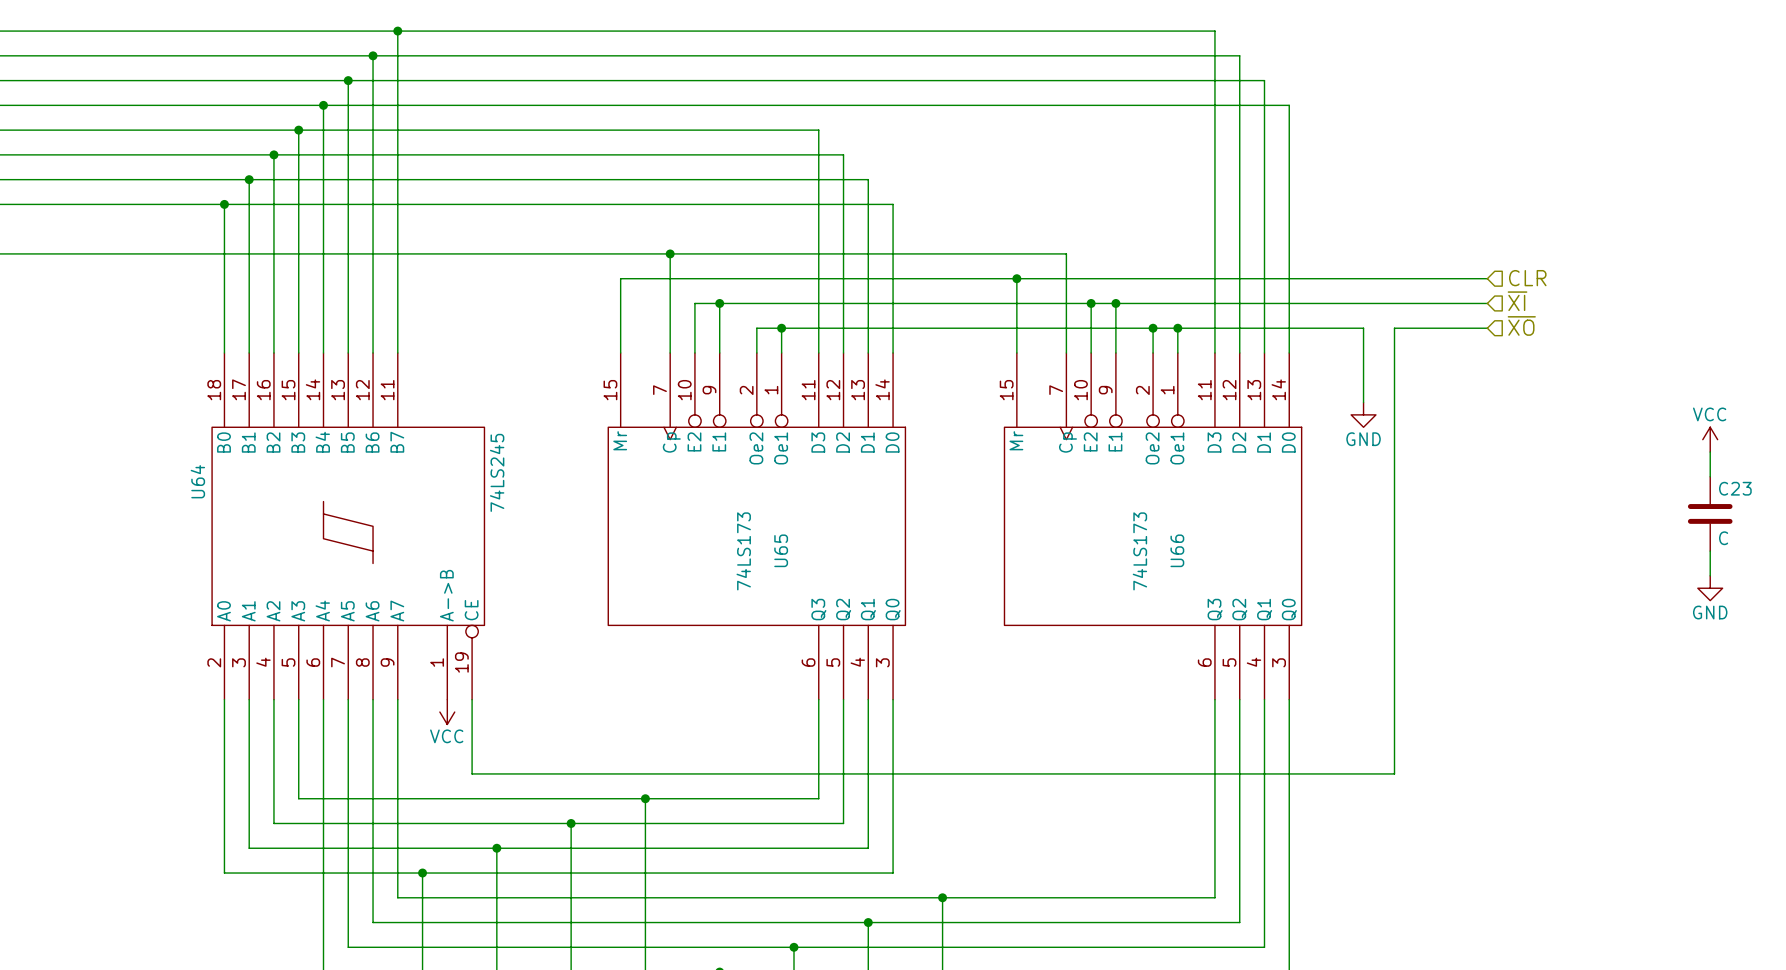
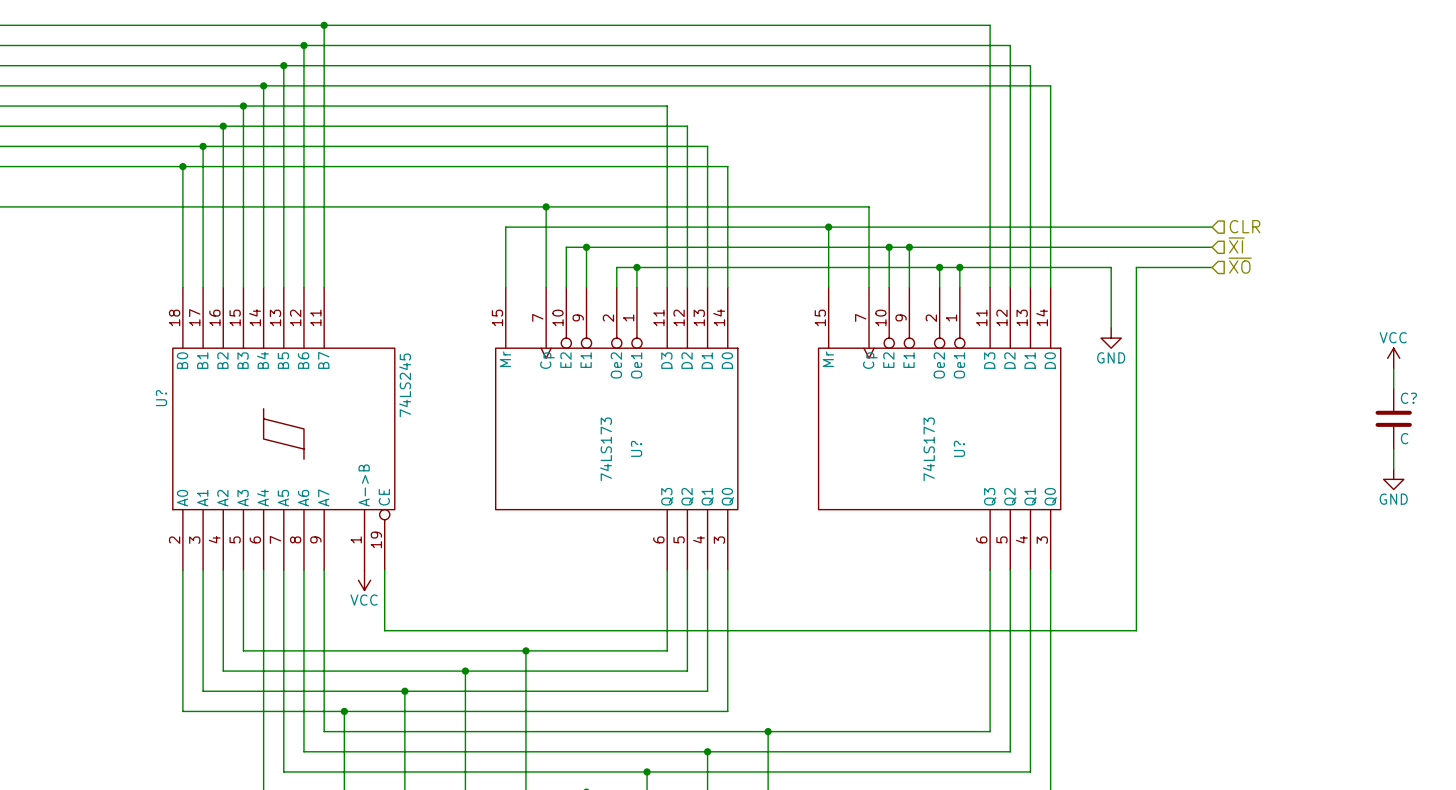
U64 name: U64 (197, 481) -> U? (161, 398)
C23 name: C23 (1735, 488) -> C? (1408, 398)
U65 name: U65 (781, 550) -> U? (636, 448)
U66 name: U66 (1177, 550) -> U? (959, 448)

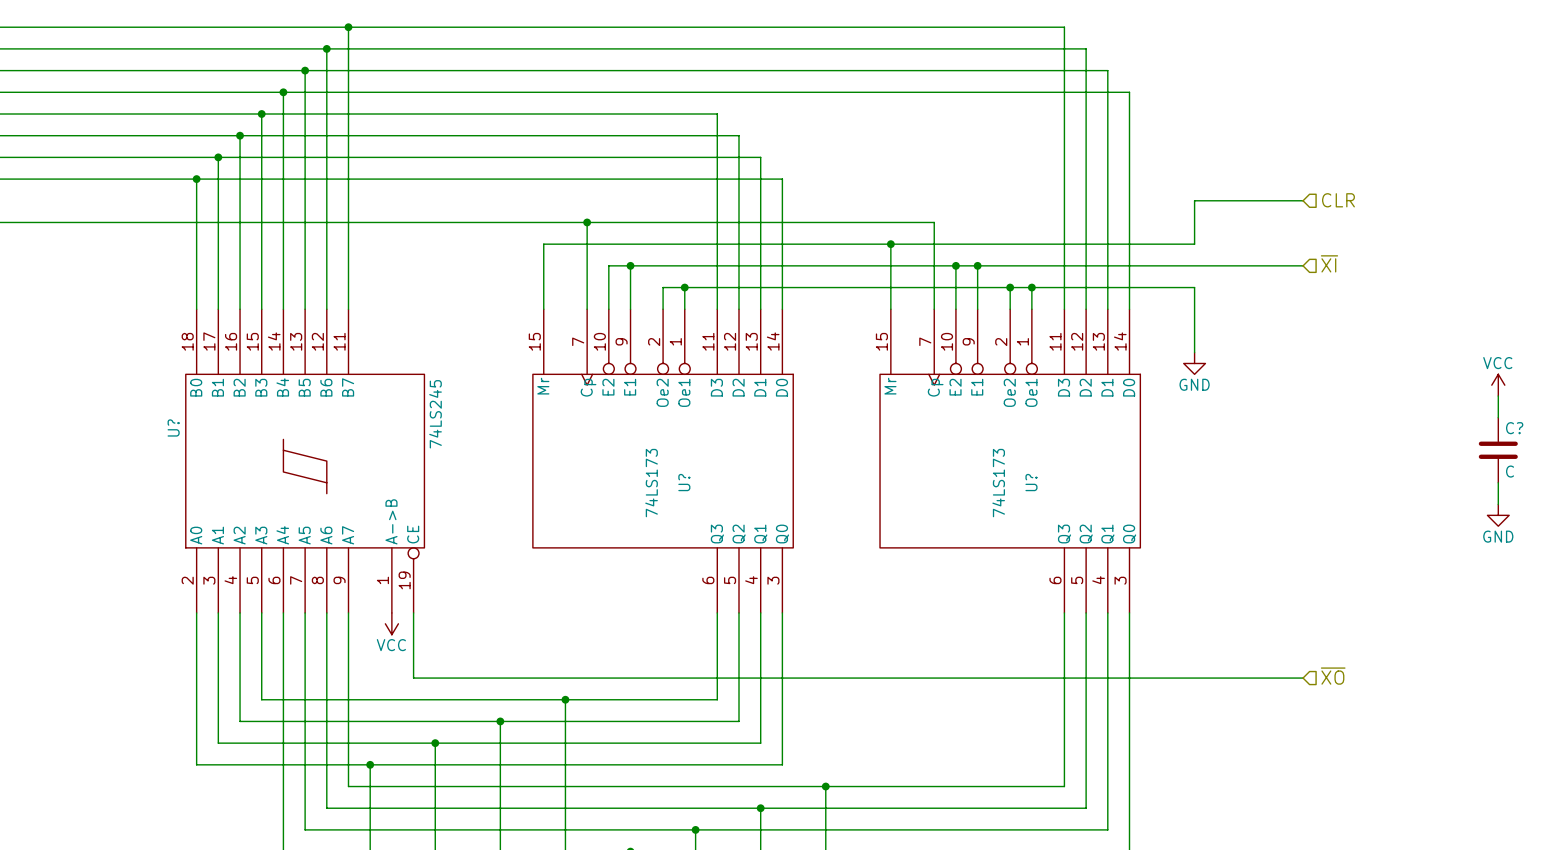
hierarchical label position: CLR (1245, 226) -> CLR (1338, 200)
wire: (1111, 227) (1212, 227) -> (1194, 244) (1194, 200) (1303, 200)
hierarchical label: ~{XO} (1240, 265) -> none
wire: (1212, 267) (1136, 267) (1136, 630) -> (1303, 678) (1221, 678)
hierarchical label: none -> ~{XO} (1333, 676)

